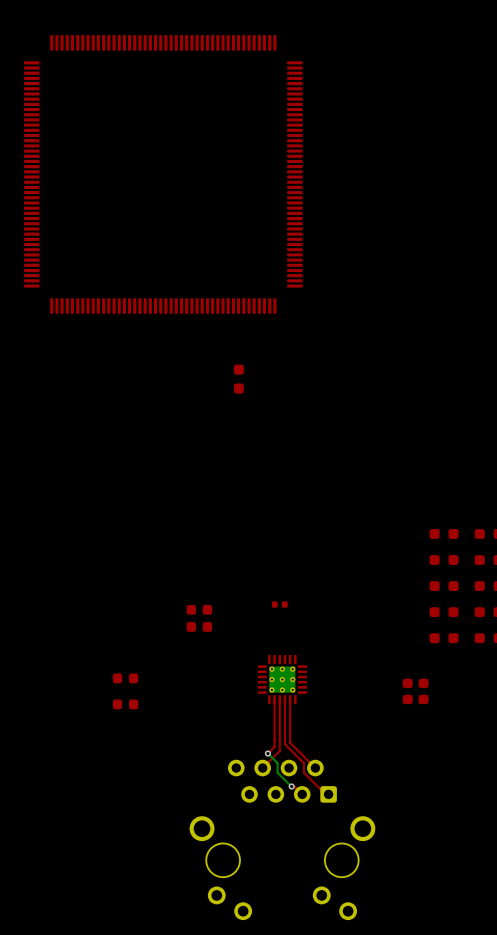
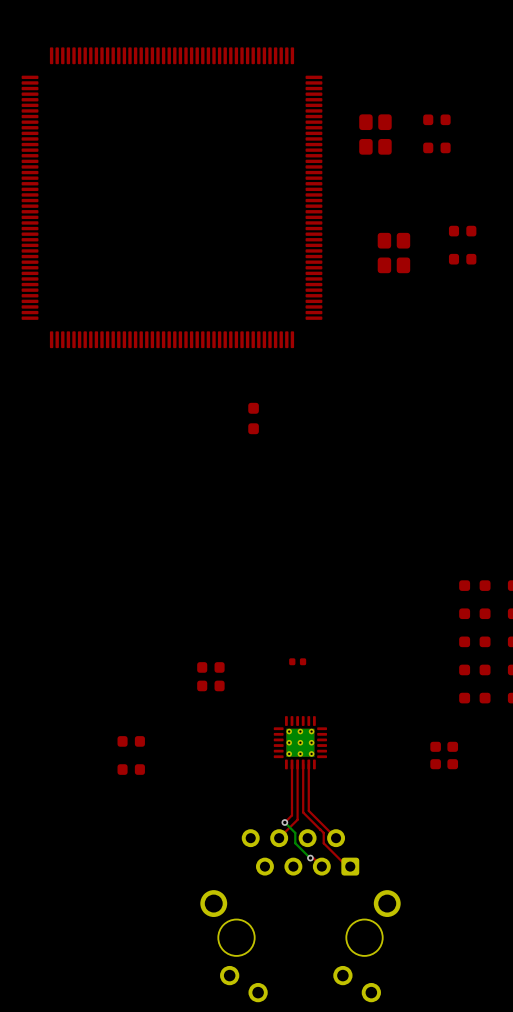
part: none -> (436, 119)
part: none -> (375, 134)
part: none -> (436, 147)
part: none -> (462, 231)
part: none -> (393, 253)
part: none -> (462, 259)

